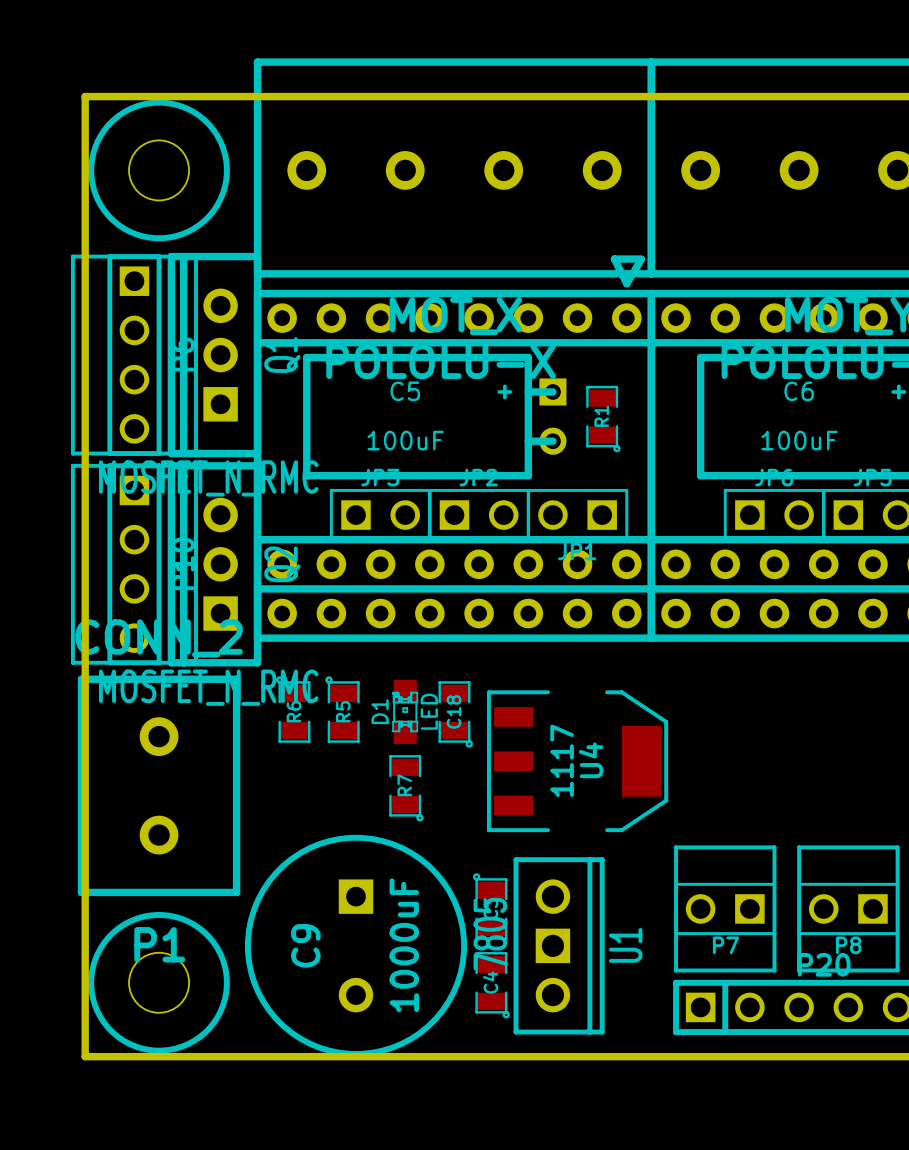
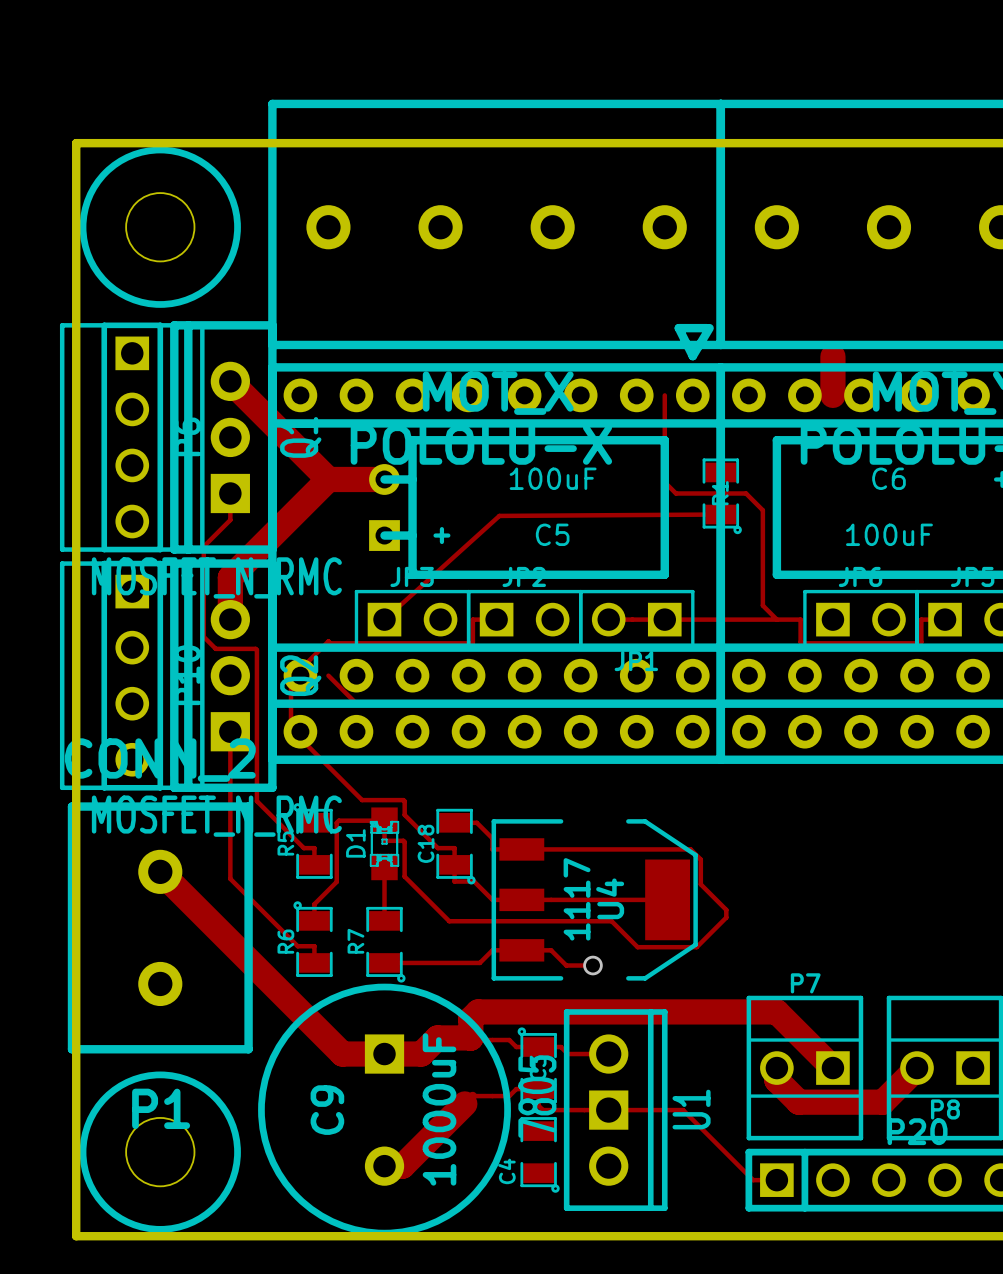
track: none -> (832, 356) (832, 395)
track: none -> (230, 381) (328, 479)
track: none -> (664, 395) (664, 482) (675, 493) (746, 493) (762, 510) (762, 605) (776, 619)
track: none -> (328, 479) (384, 479)
track: none -> (328, 479) (230, 577) (230, 619)
track: none -> (230, 493) (230, 520) (203, 546) (203, 636) (215, 648) (256, 650) (256, 801) (303, 848) (314, 848) (314, 864)
C5 rotation: 0° (434, 416) -> 180° (519, 507)
R1 position: (603, 419) -> (722, 496)
track: none -> (720, 514) (499, 515) (384, 619)
track: none -> (496, 619) (472, 619) (471, 643) (330, 643) (328, 641) (291, 678) (291, 729) (362, 800) (403, 800) (404, 814) (437, 848) (454, 848) (454, 881) (474, 881) (492, 899) (667, 899)
track: none -> (608, 619) (800, 619) (801, 643) (920, 643) (921, 619) (945, 619)
track: none -> (328, 675) (356, 703)
track: none -> (230, 731) (230, 878) (297, 946) (314, 946) (314, 962)
track: none -> (454, 822) (476, 822) (492, 838) (492, 849) (690, 849) (700, 859) (700, 884) (726, 909) (726, 917) (696, 947) (637, 947) (611, 921) (449, 921) (404, 876) (404, 842) (384, 840) (384, 820) (338, 820) (336, 822) (336, 881) (314, 904) (314, 920)
R5: (342, 709) -> none
R6 name: R6 (294, 711) -> R5 (285, 843)
D1 value: LED (429, 711) -> none
D1 position: (405, 712) -> (384, 843)
C18 name position: C18 (454, 712) -> C18 (426, 843)
C18 position: (455, 714) -> (455, 846)
track: none -> (384, 866) (384, 920)
track: none -> (160, 871) (342, 1054) (421, 1054) (437, 1037) (470, 1037)
U4 position: (577, 761) -> (594, 899)
R7 name position: R7 (404, 785) -> R7 (355, 941)
R7 position: (406, 788) -> (385, 944)
R6: none -> (313, 939)
track: none -> (384, 962) (479, 962) (492, 950) (551, 950) (566, 965) (592, 965)
via: none -> (592, 965)
track: none -> (608, 1054) (567, 1054) (560, 1047) (516, 1047) (509, 1040) (472, 1040) (470, 1038) (470, 1019) (478, 1011) (776, 1011) (832, 1068)
track: none -> (776, 1068) (776, 1080) (798, 1102) (882, 1102) (917, 1068)
P7 name position: P7 (725, 945) -> P7 (805, 983)
C4 name position: C4 (490, 982) -> C4 (506, 1171)
track: none -> (384, 1166) (402, 1166) (472, 1096) (509, 1096) (516, 1089) (538, 1089) (538, 1105) (542, 1110) (683, 1110) (753, 1180) (776, 1180)

